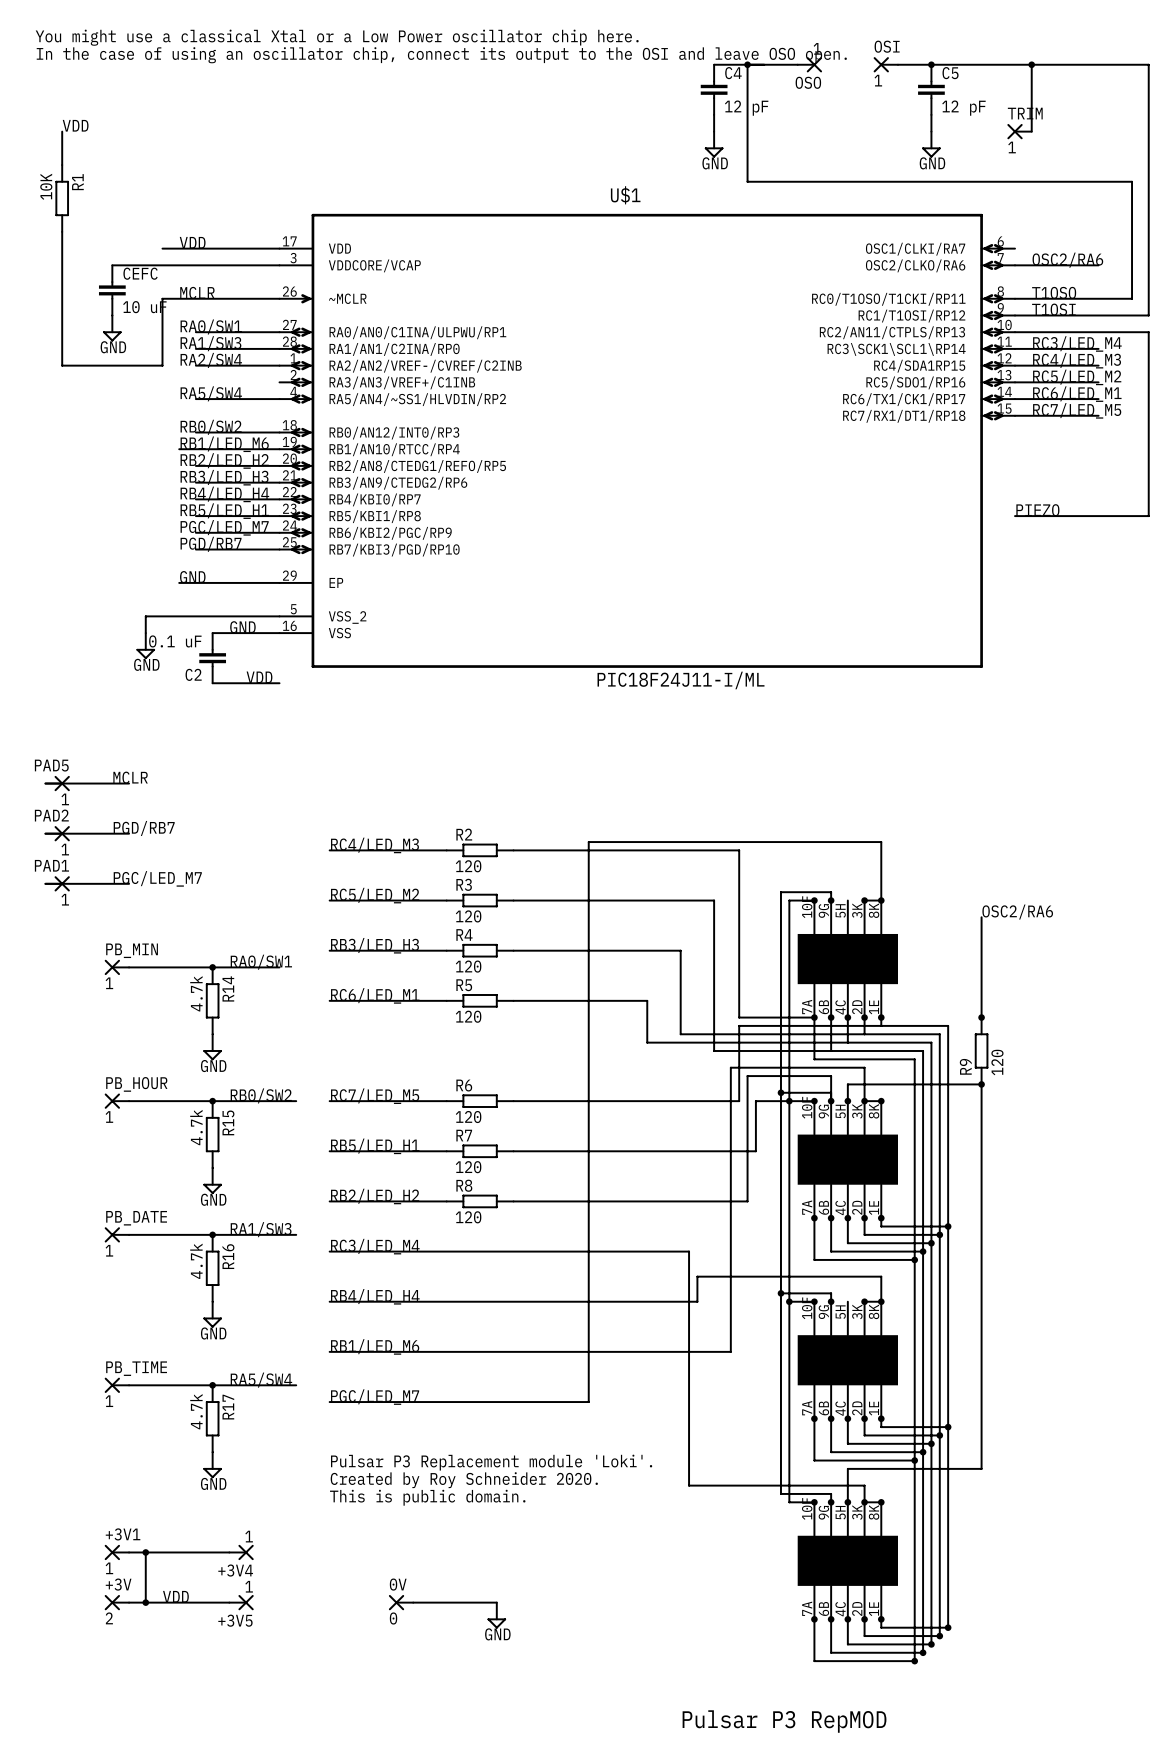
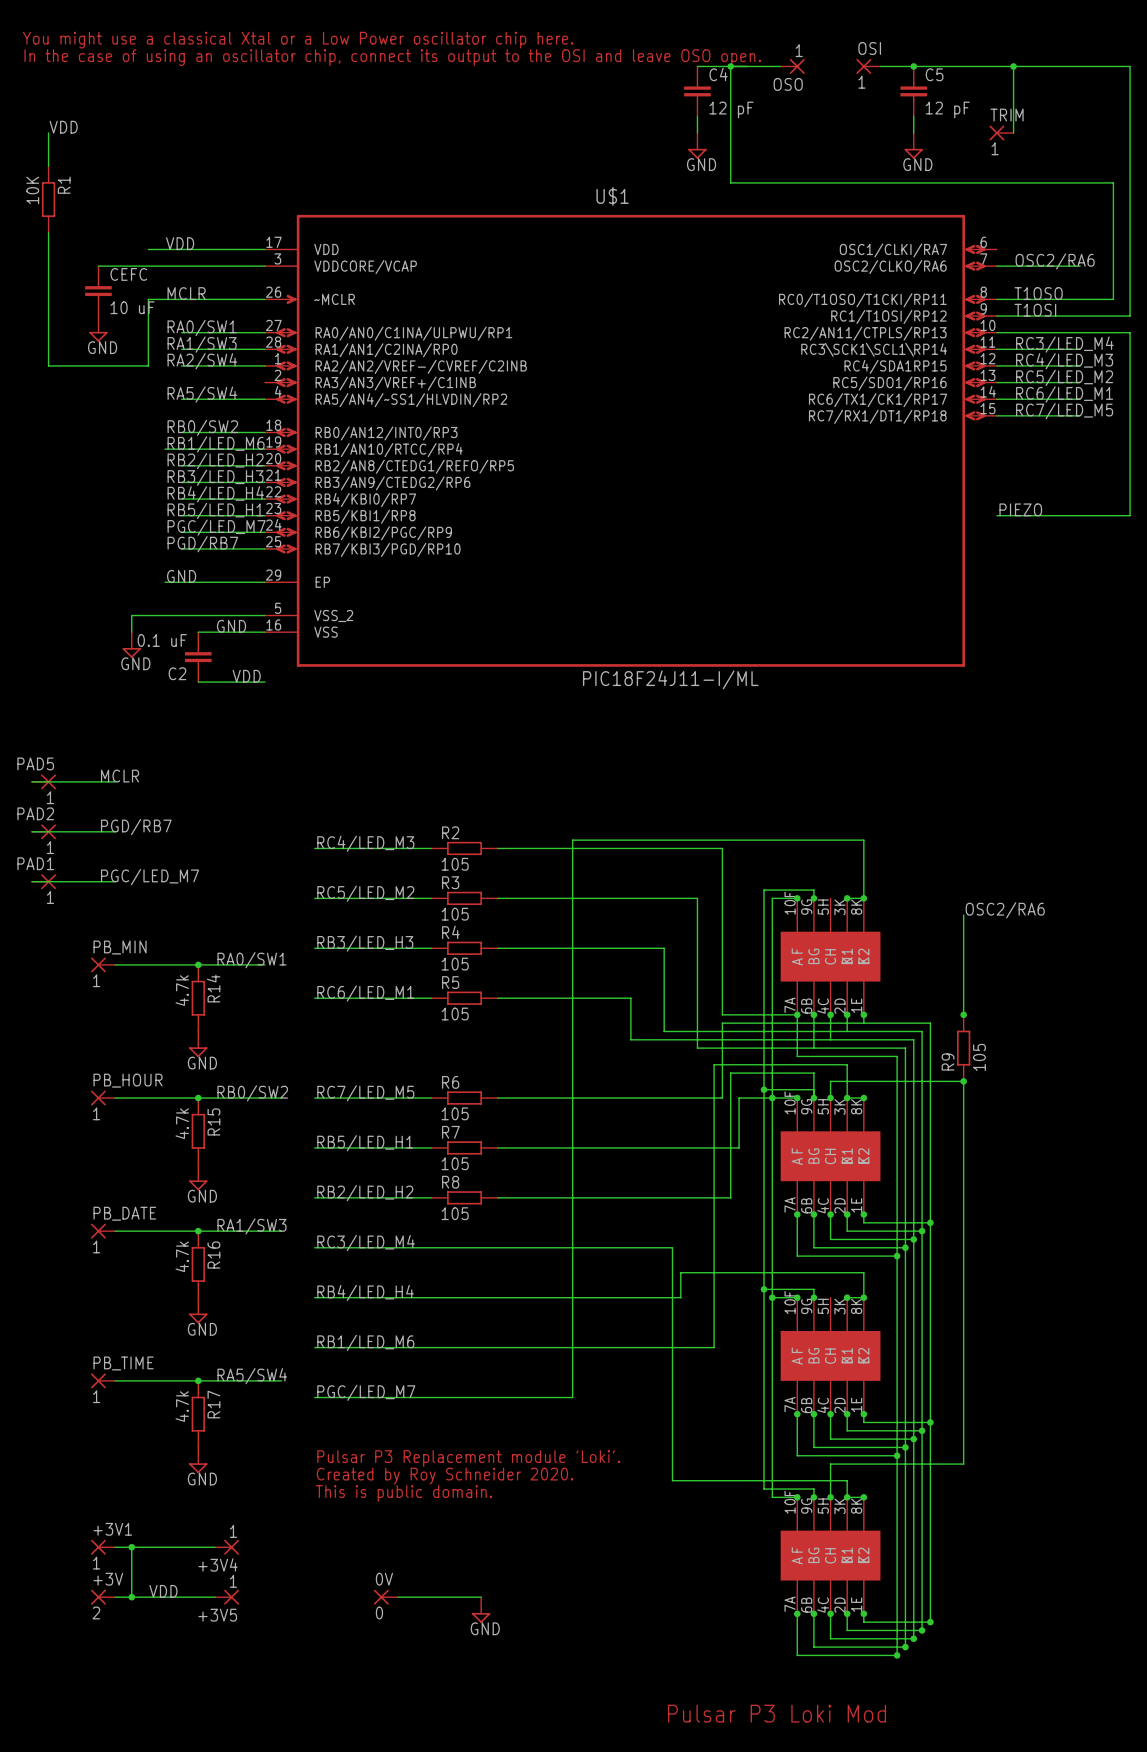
R2 value: 120 (468, 866) -> 105 (455, 864)
R3 value: 120 (468, 916) -> 105 (455, 914)
R4 value: 120 (468, 966) -> 105 (455, 964)
R5 value: 120 (468, 1016) -> 105 (455, 1014)
R9 value: 120 (997, 1062) -> 105 (979, 1057)
R6 value: 120 (468, 1117) -> 105 (455, 1113)
R7 value: 120 (468, 1167) -> 105 (455, 1163)
R8 value: 120 (468, 1217) -> 105 (455, 1213)
text: Pulsar P3 RepMOD (784, 1721) -> Pulsar P3 Loki Mod (777, 1713)

